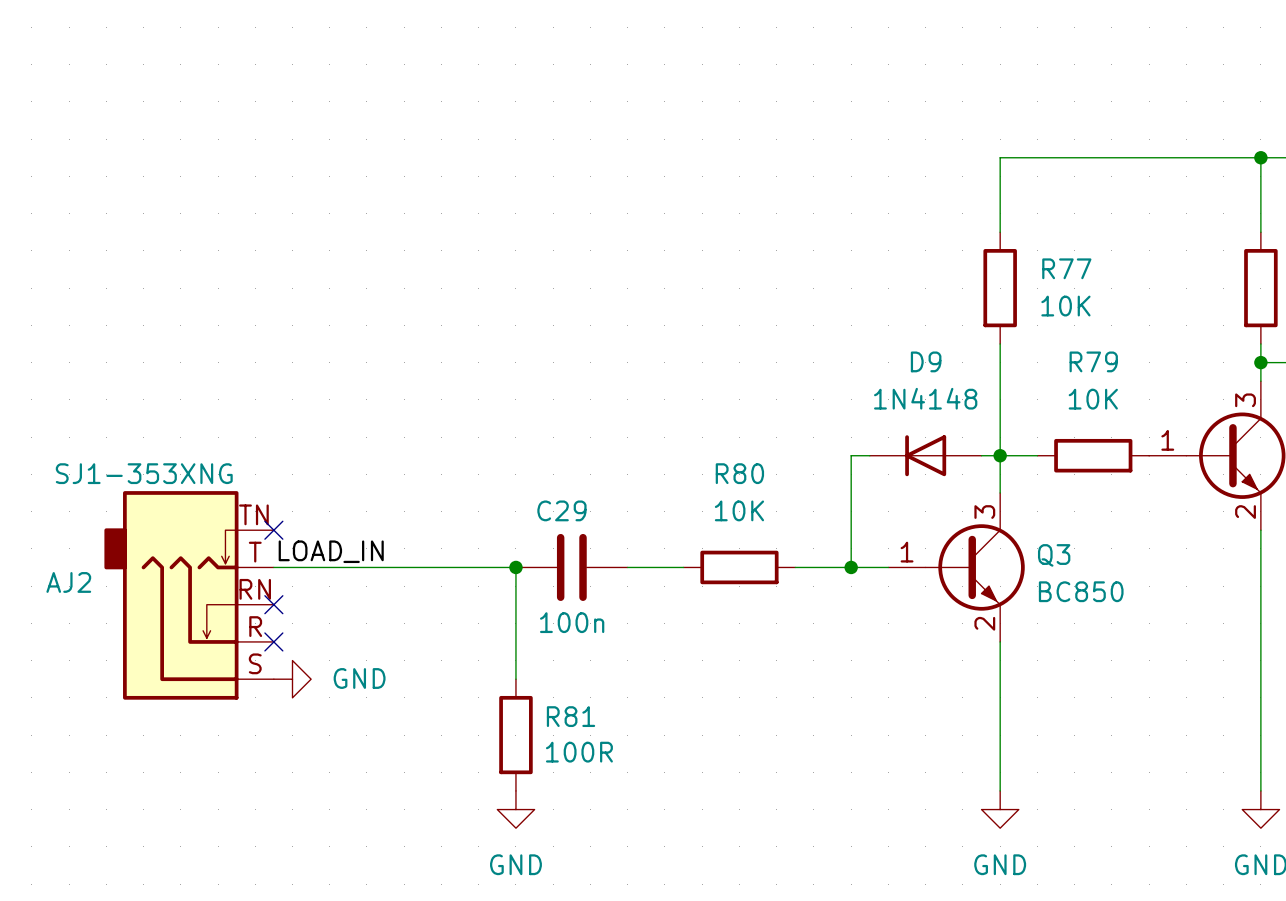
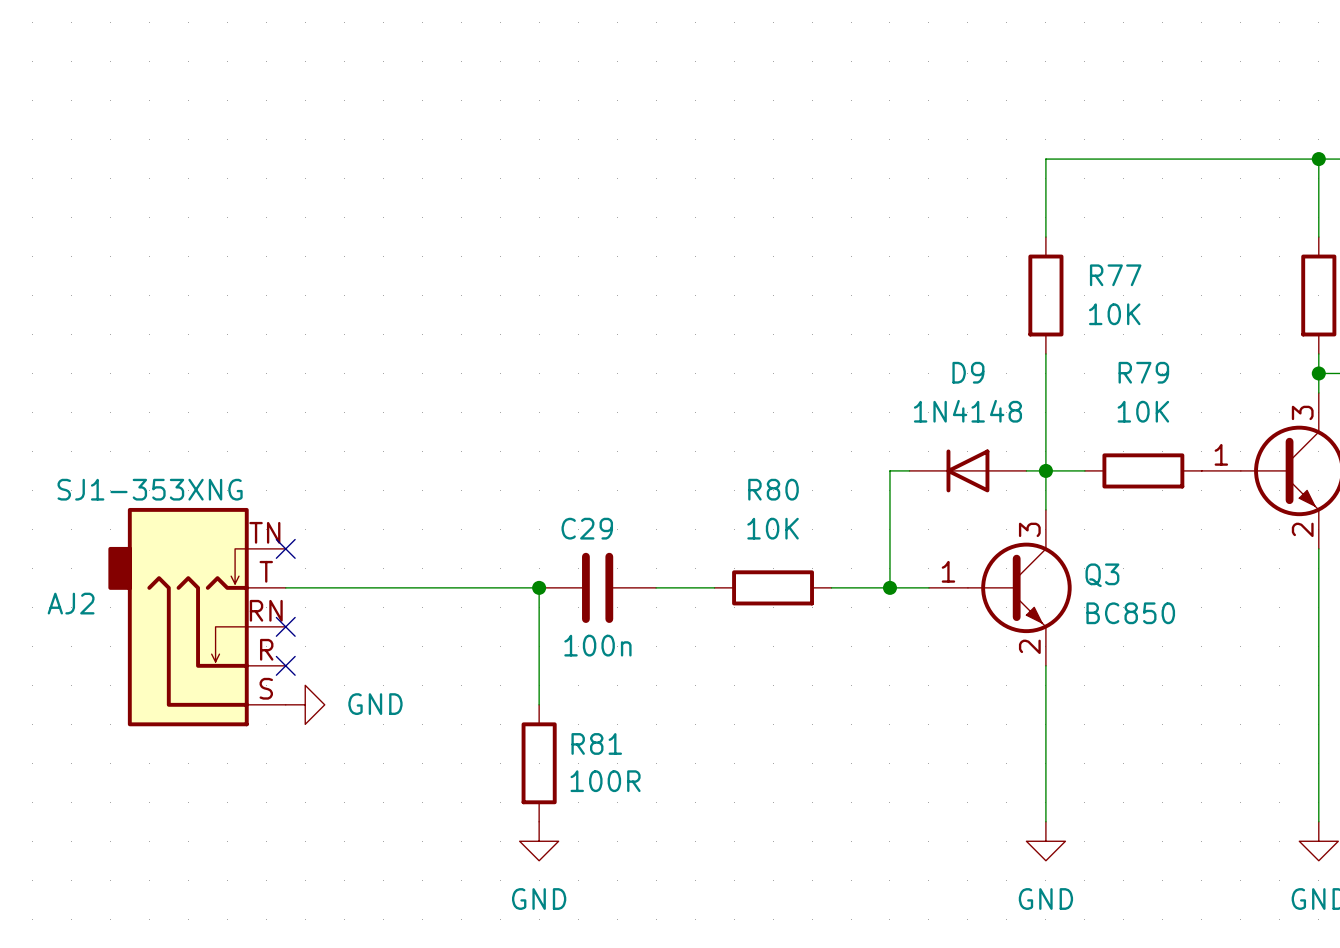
label: LOAD_IN (331, 551) -> none

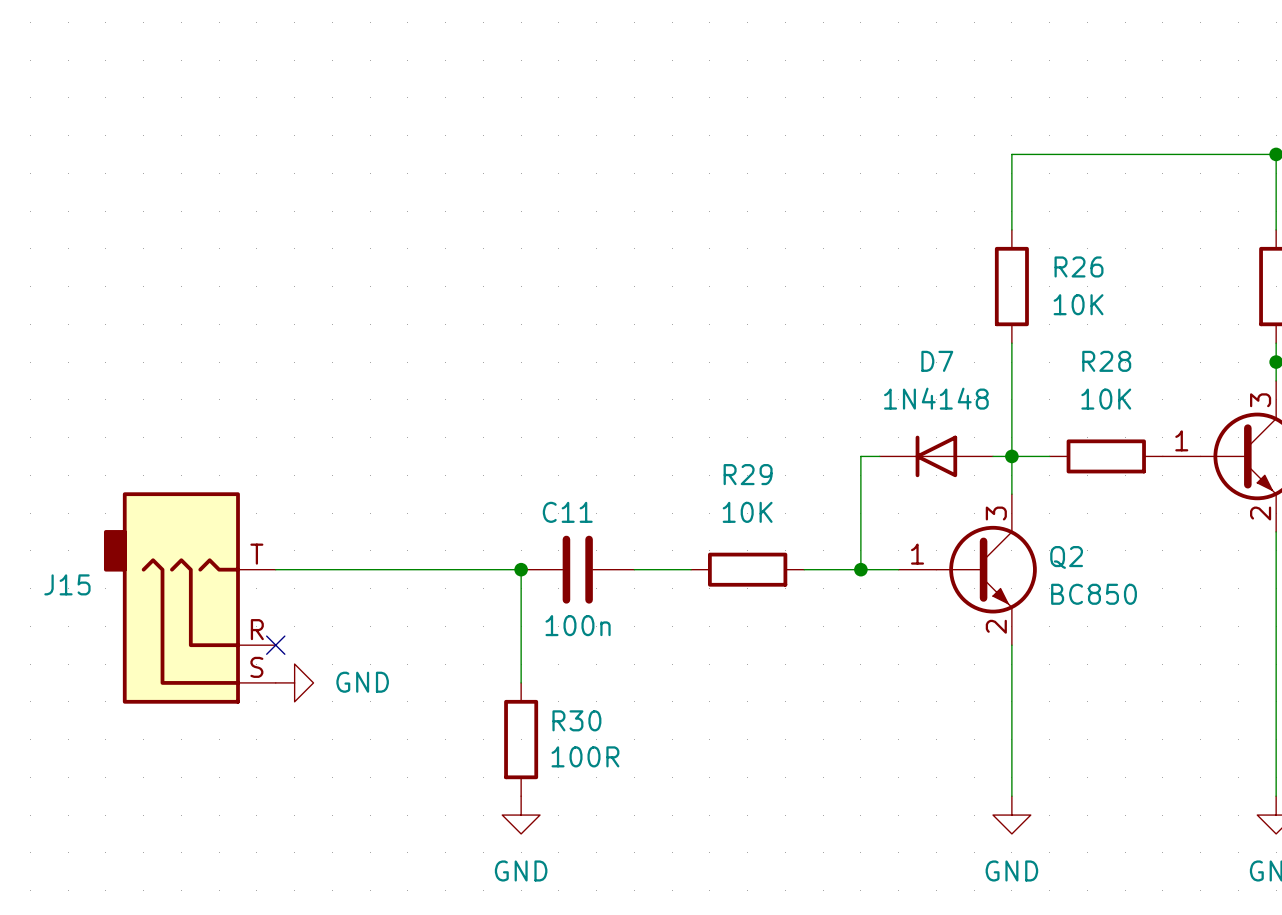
R77 name: R77 (1115, 275) -> R26 (1079, 266)
D9 name: D9 (968, 372) -> D7 (937, 361)
R79 name: R79 (1143, 372) -> R28 (1106, 361)
R80 name: R80 (773, 489) -> R29 (748, 474)
C29 name: C29 (587, 528) -> C11 (567, 512)
no-connect mark: (285, 548) -> none
Q3 name: Q3 (1102, 575) -> Q2 (1066, 557)
AJ2: SJ1-353XNG (197, 617) -> none
J15: none -> (189, 597)
no-connect mark: (285, 626) -> none
R81 name: R81 (596, 743) -> R30 (576, 720)

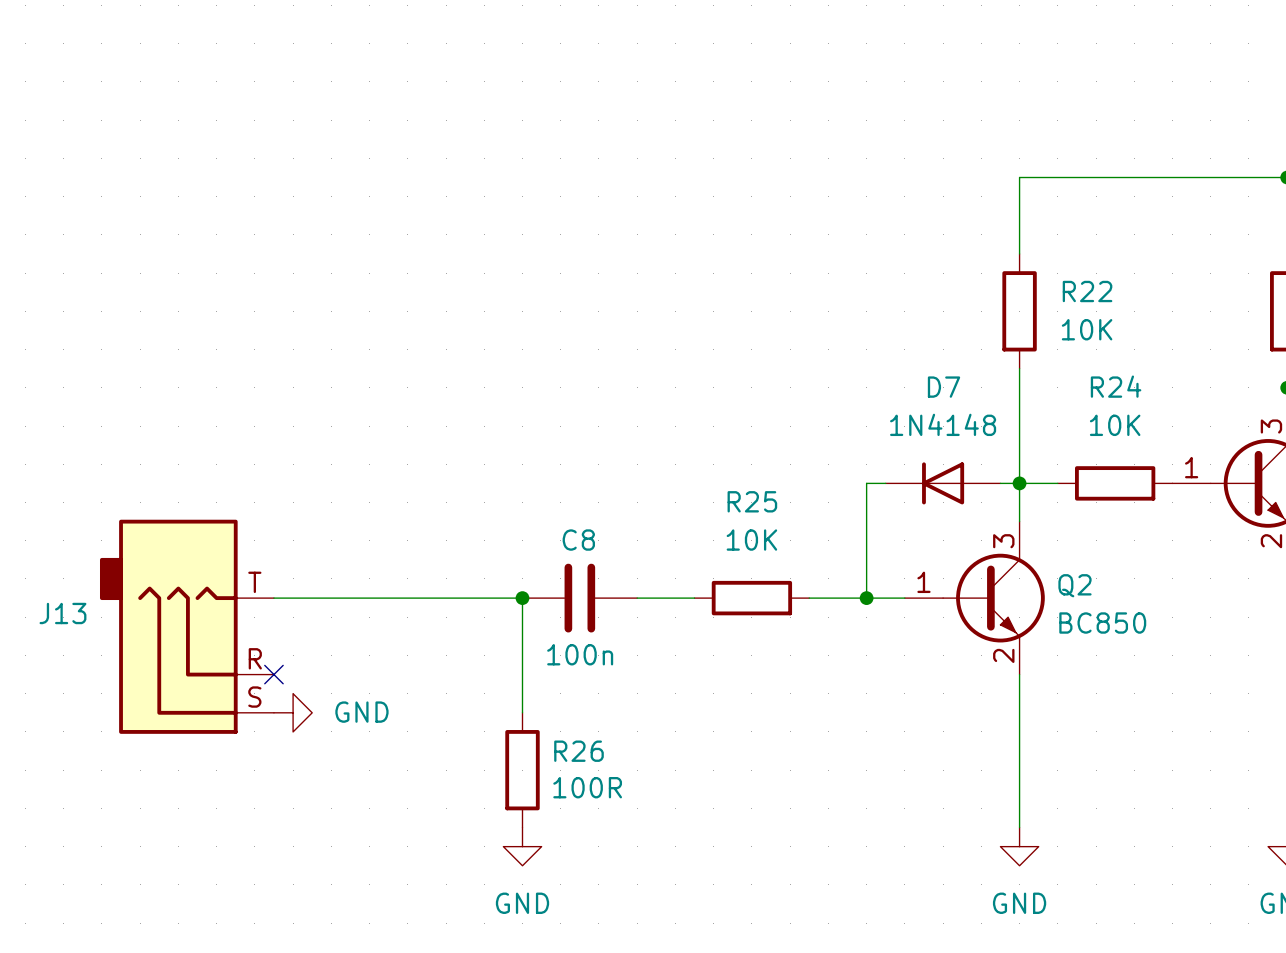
R26 name: R26 (1079, 266) -> R22 (1087, 291)
R28 name: R28 (1106, 361) -> R24 (1116, 386)
R29 name: R29 (748, 474) -> R25 (752, 501)
C11 name: C11 (567, 512) -> C8 (578, 540)
J15 name: J15 (67, 584) -> J13 (62, 613)
R30 name: R30 (576, 720) -> R26 (578, 751)

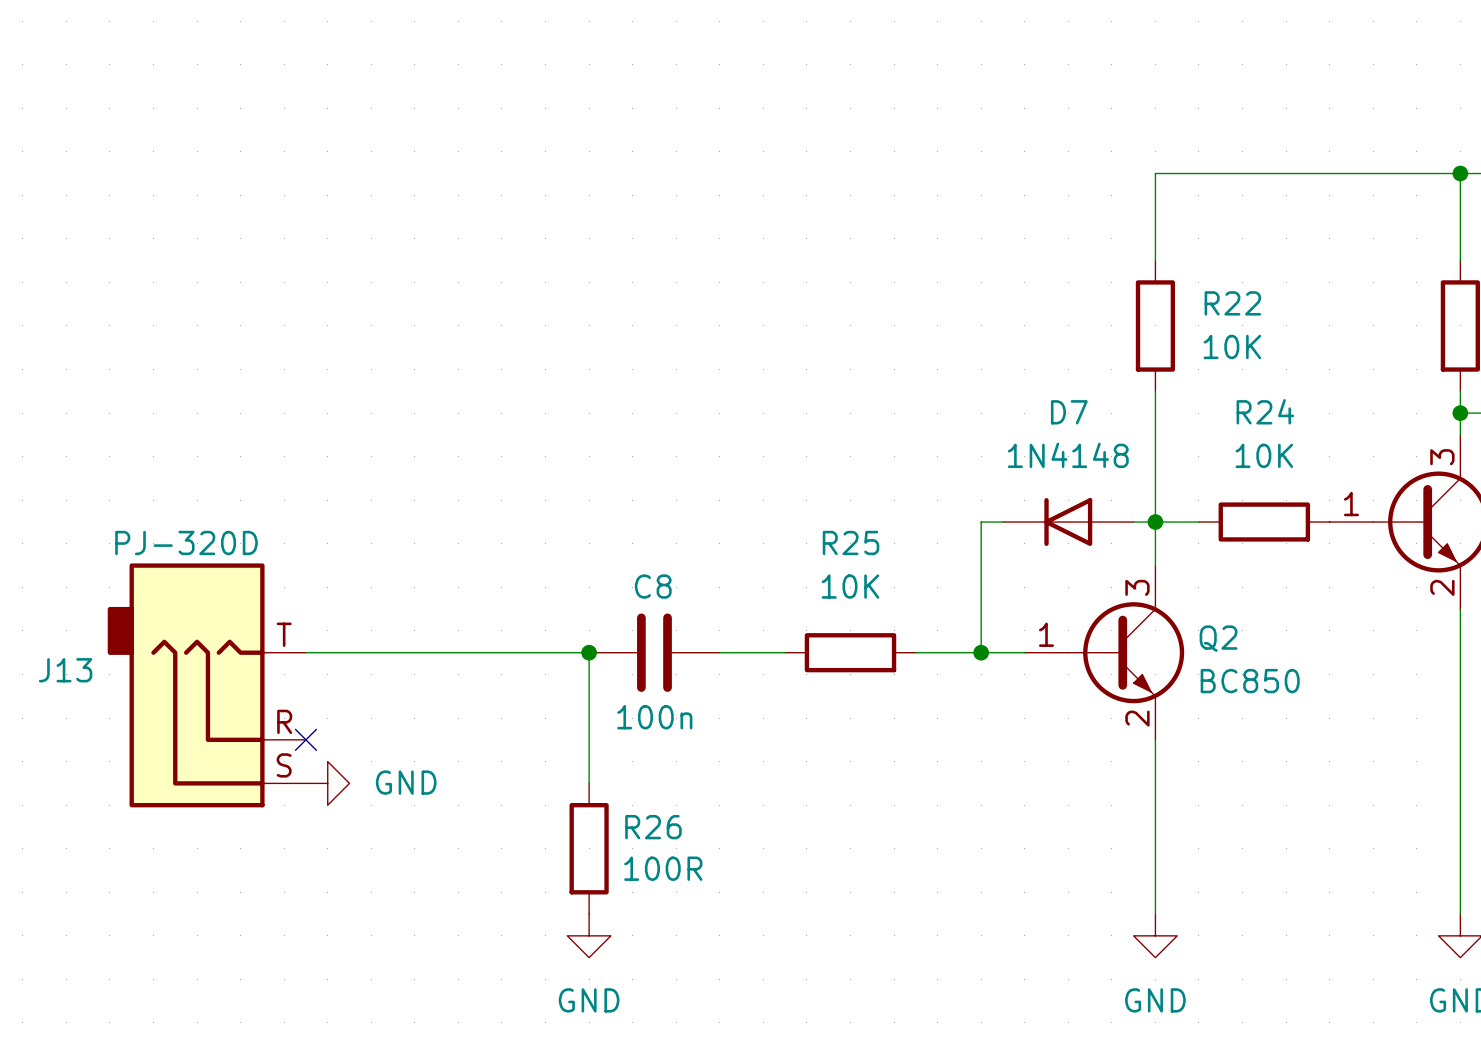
J13 value: none -> PJ-320D (186, 542)

